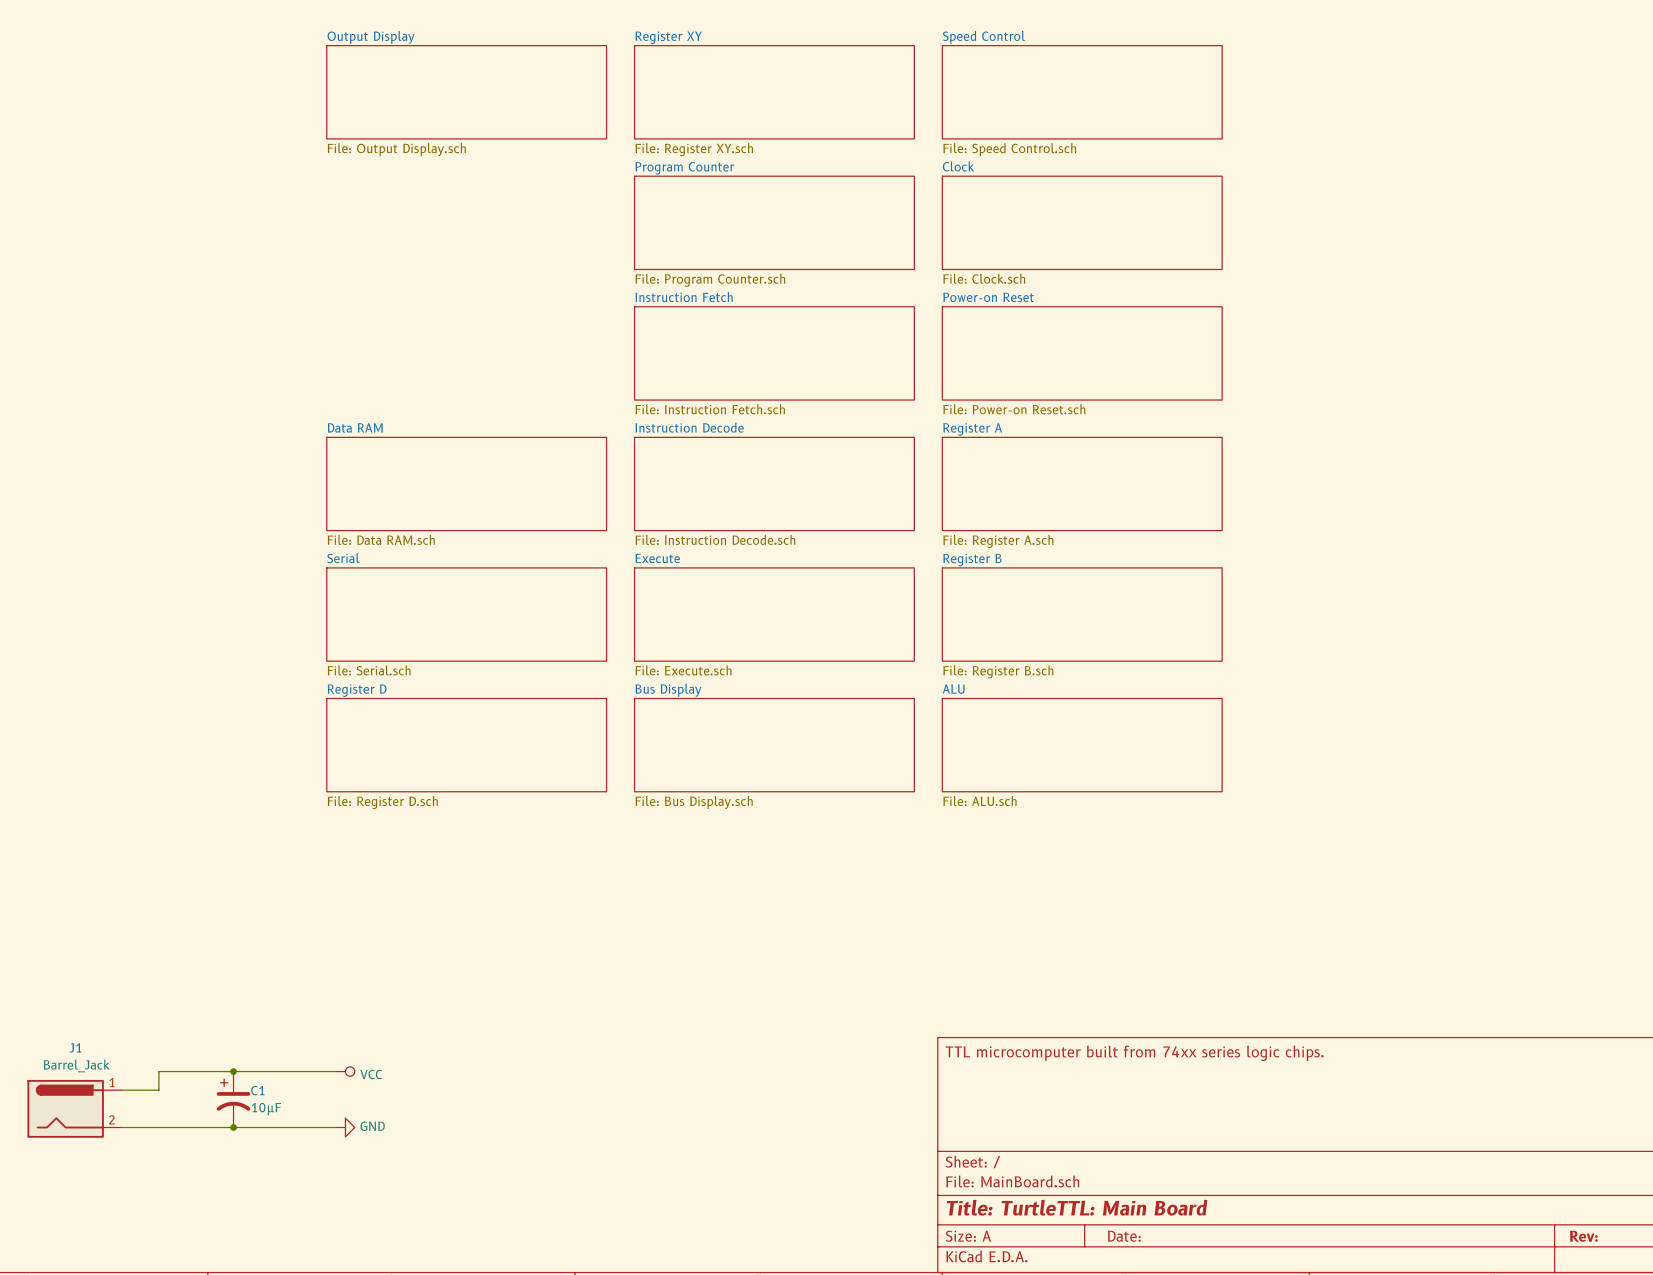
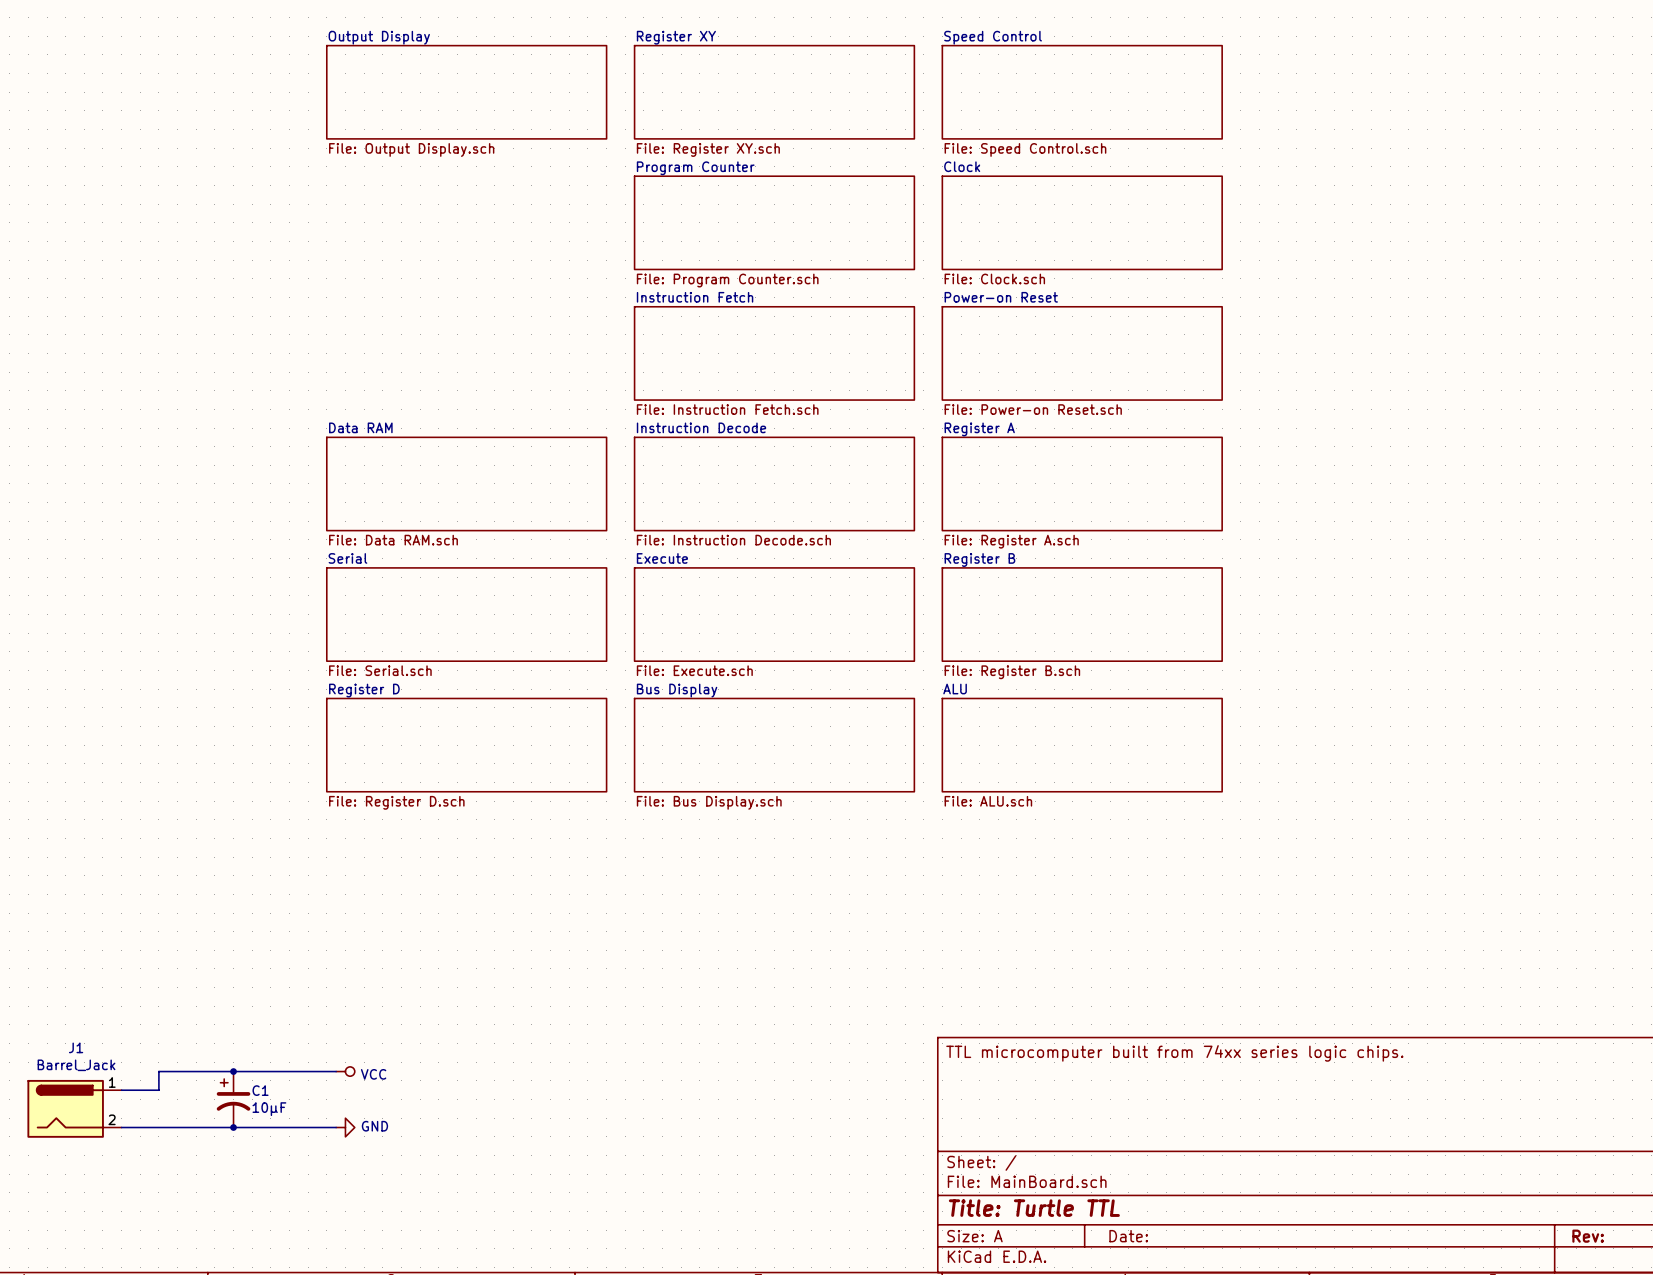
title block: Title: TurtleTTL: Main Board (1077, 1207) -> Title: Turtle TTL (1034, 1208)

